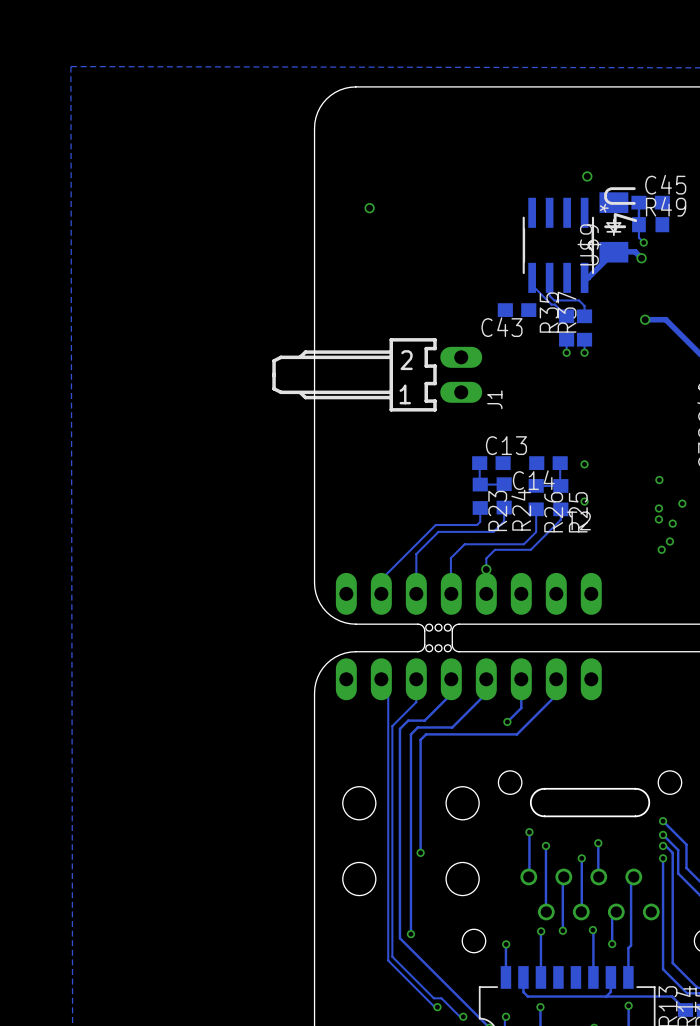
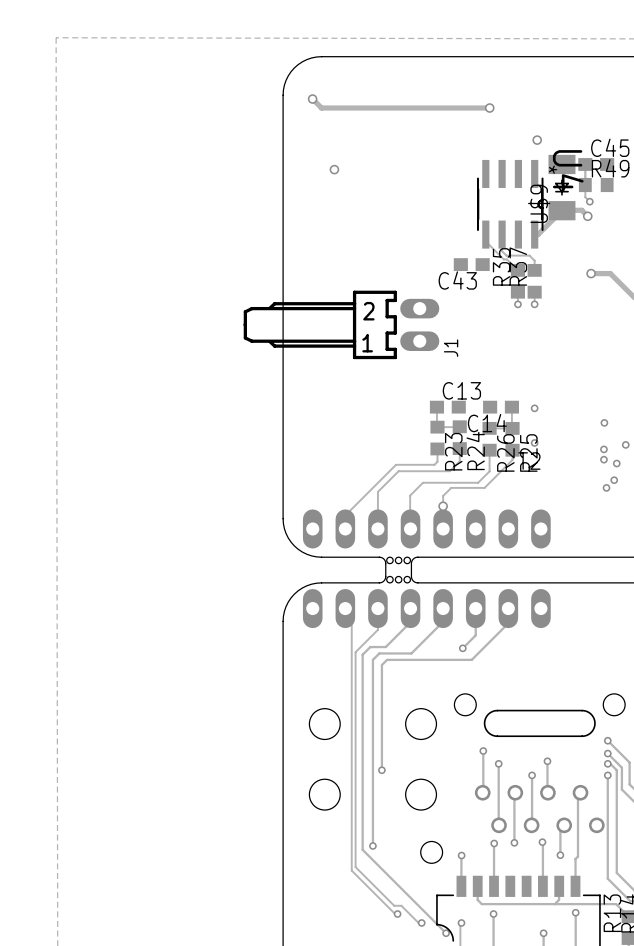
track: none -> (312, 99) (321, 108) (489, 108)
via: none -> (312, 99)
via: none -> (489, 108)

